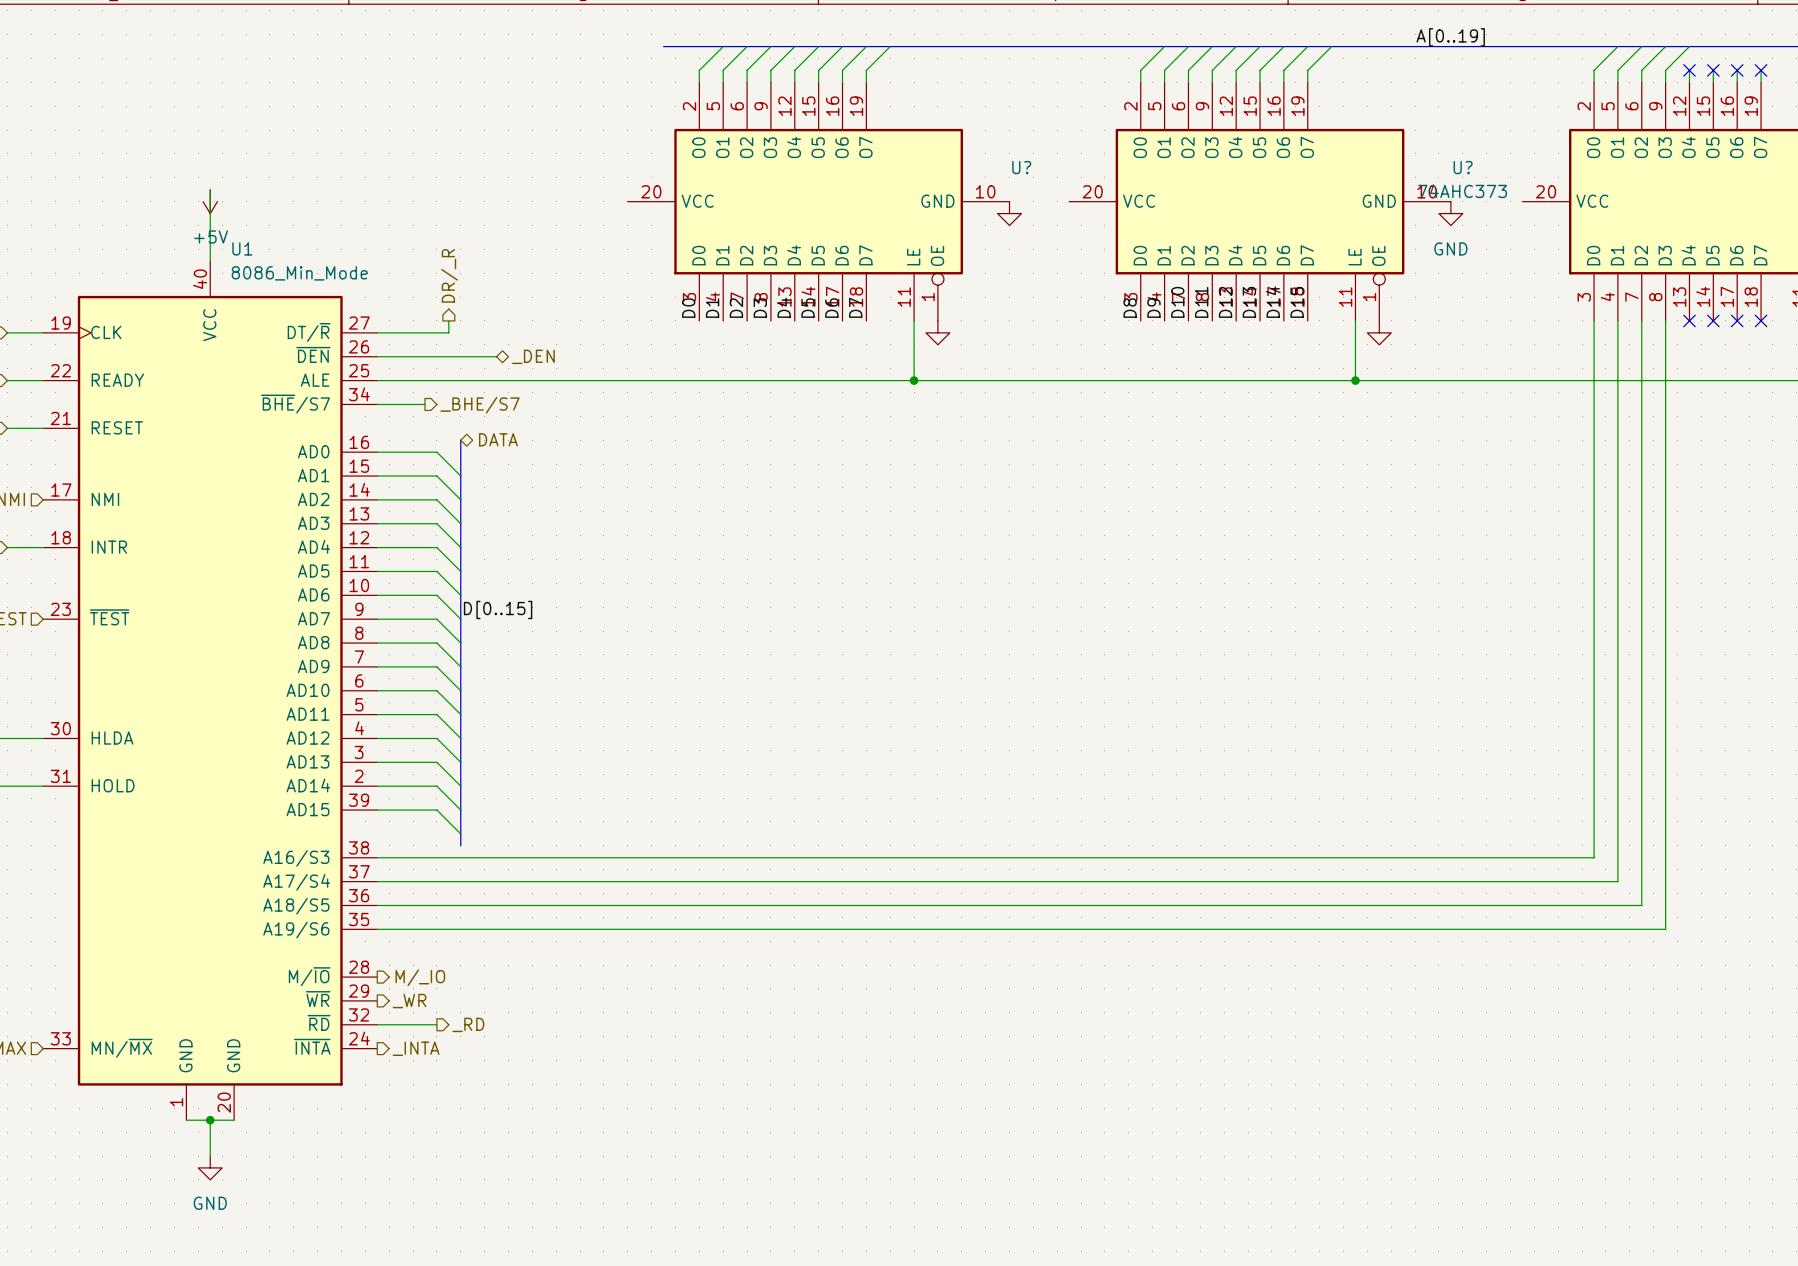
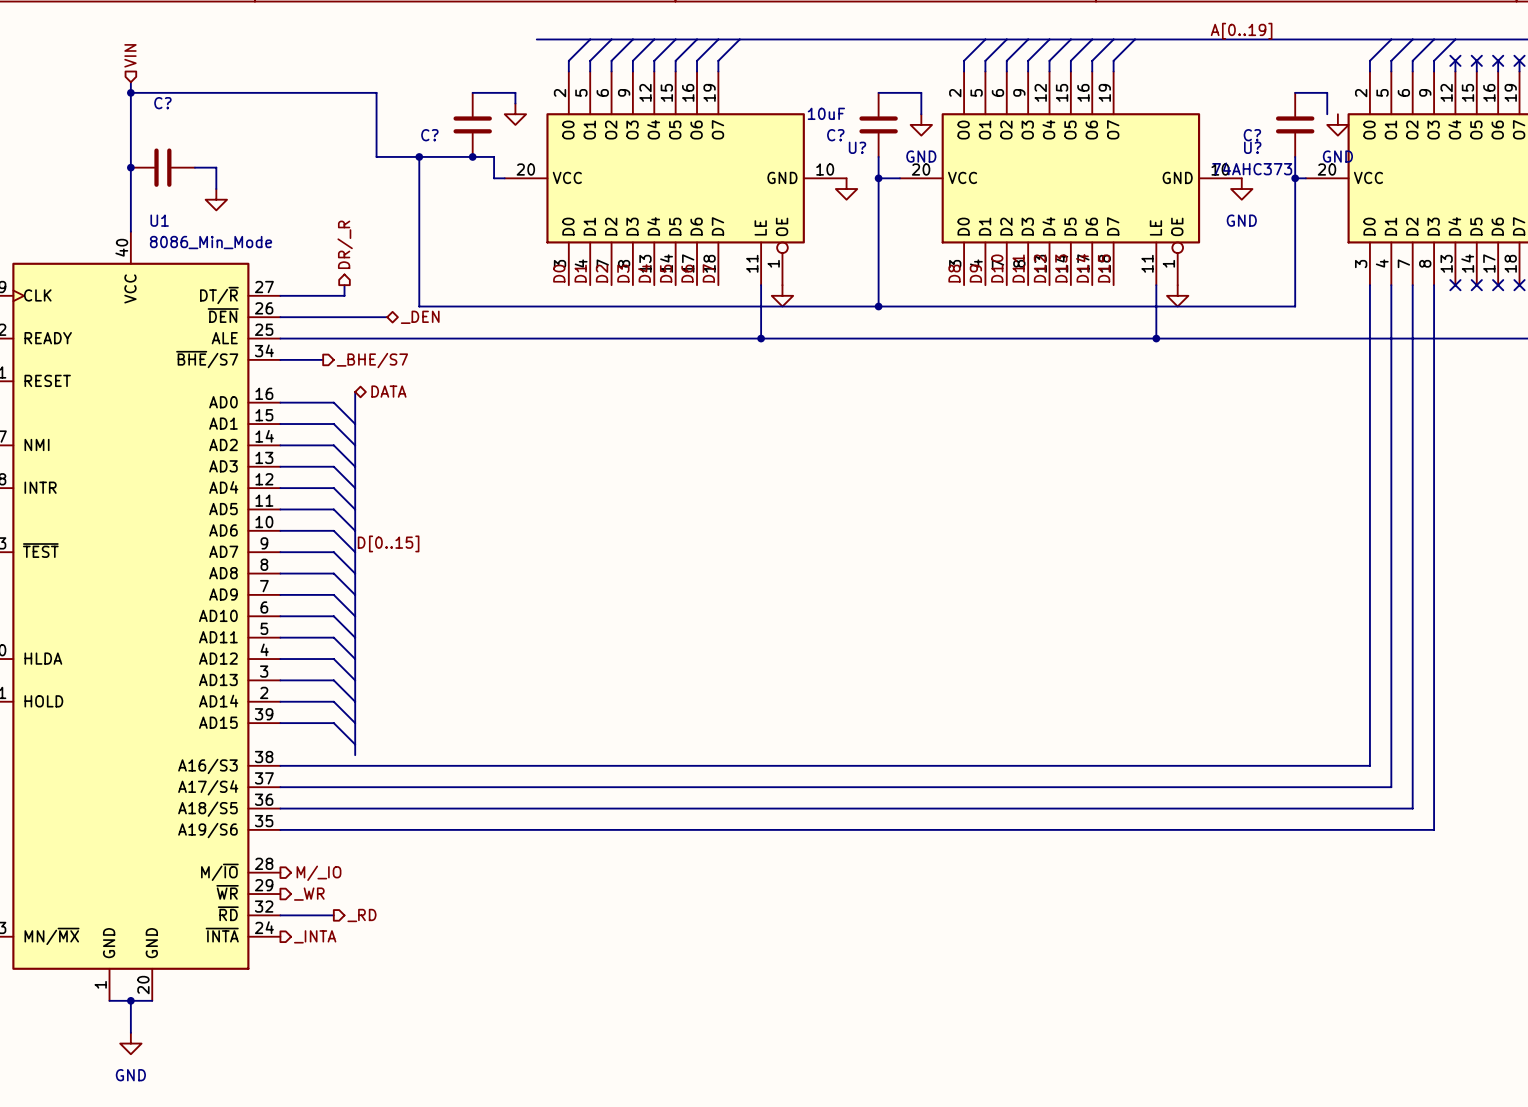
hierarchical label: none -> VIN (130, 55)
wire: none -> (130, 82) (130, 167)
wire: none -> (130, 92) (376, 92) (376, 156) (494, 156) (494, 178) (504, 178)
junction: none -> (130, 92)
wire: none -> (472, 92) (515, 92) (515, 103)
wire: none -> (878, 92) (921, 92) (921, 114)
wire: none -> (1295, 92) (1327, 92) (1327, 114)
power symbol: none -> (515, 114)
C?: none -> (472, 124)
C?: none -> 10uF (878, 124)
power symbol: none -> GND (921, 124)
C?: none -> (1295, 124)
power symbol: none -> GND (1337, 124)
wire: none -> (419, 156) (419, 306) (1295, 306) (1295, 156)
junction: none -> (419, 156)
junction: none -> (472, 156)
wire: none -> (878, 156) (878, 306)
junction: none -> (130, 167)
C?: none -> (162, 167)
wire: none -> (194, 167) (216, 167) (216, 189)
power symbol: +5V (210, 201) -> none
wire: none -> (878, 178) (899, 178)
junction: none -> (878, 178)
wire: none -> (1295, 178) (1305, 178)
junction: none -> (1295, 178)
power symbol: none -> (216, 199)
junction: none -> (878, 306)

